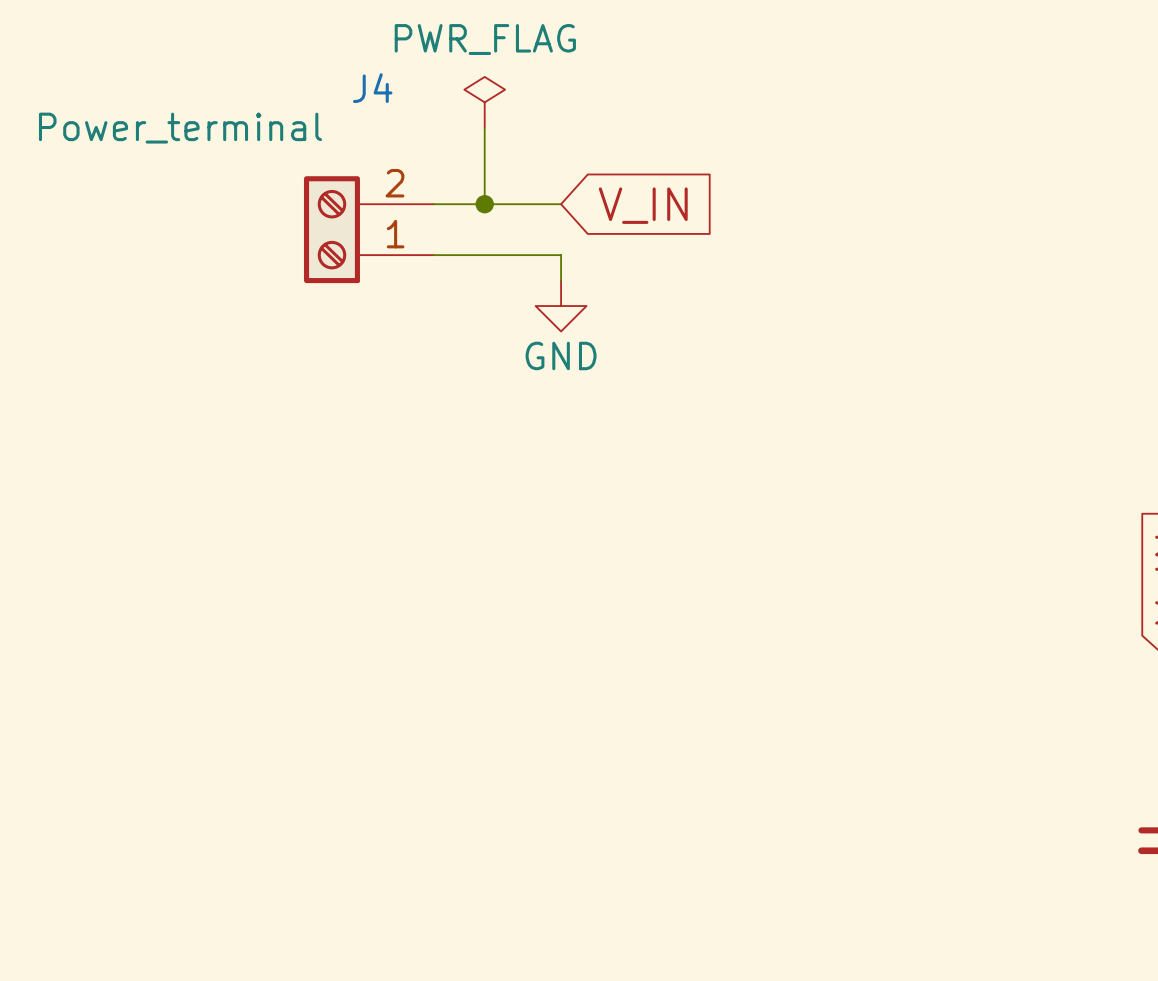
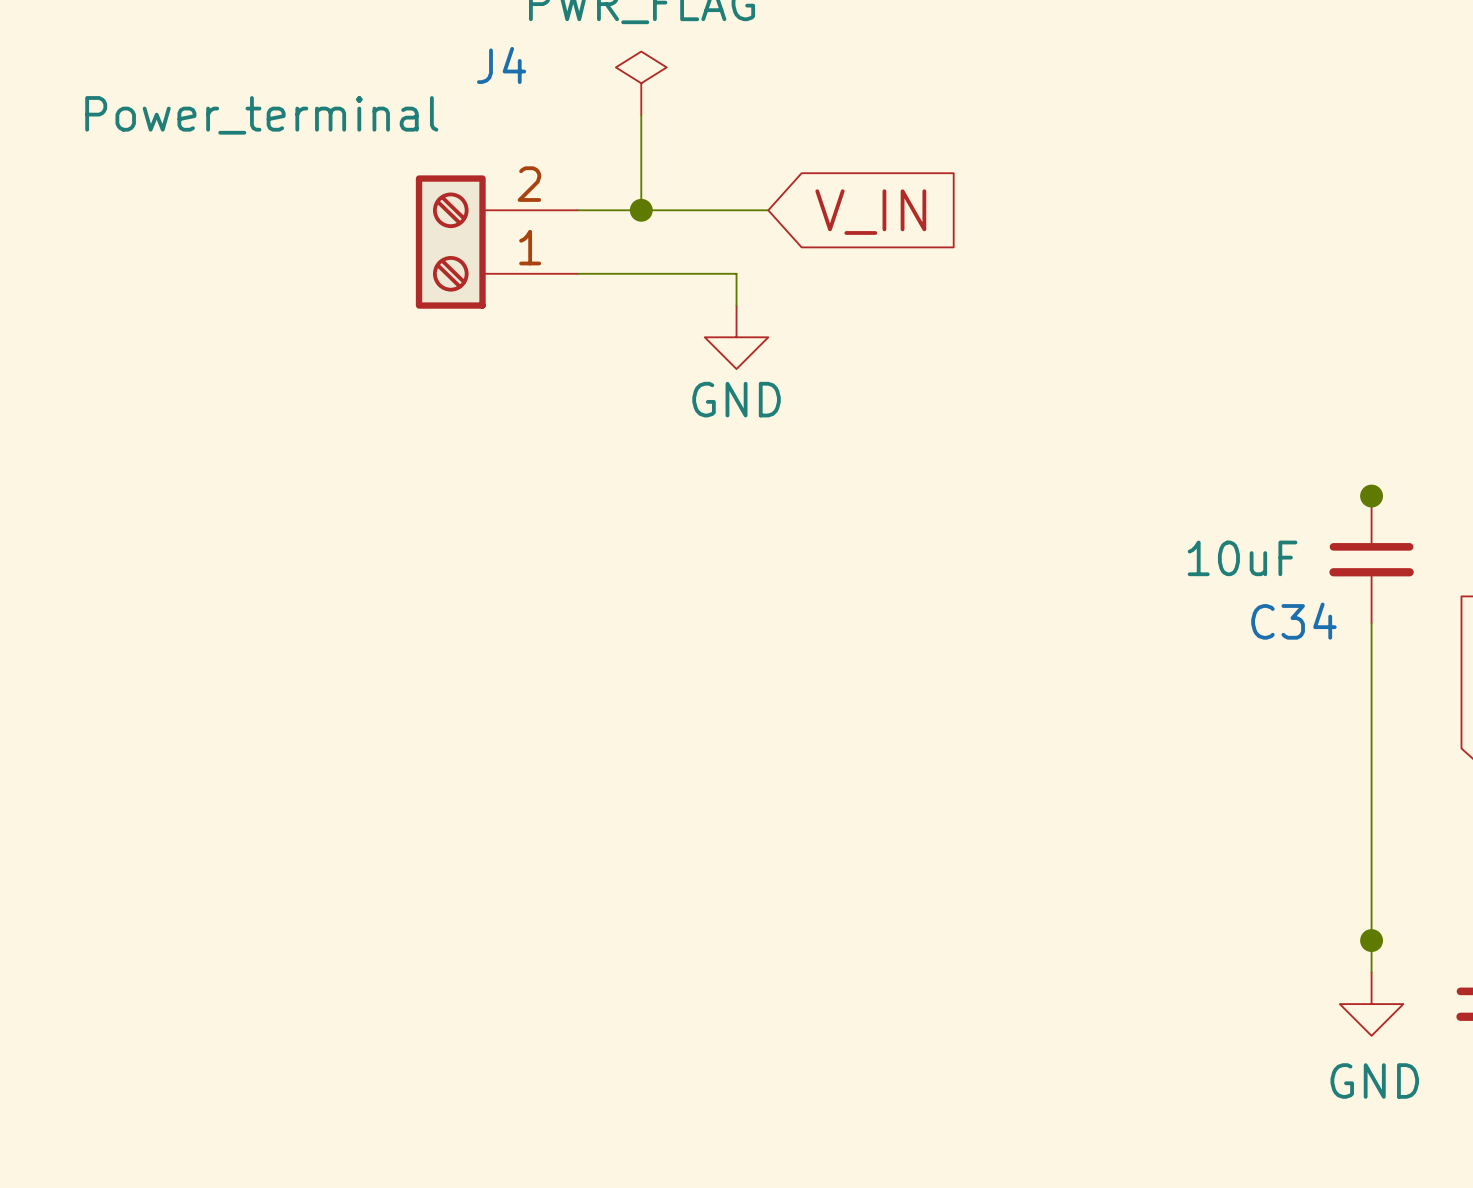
wire: none -> (736, 210) (768, 210)
global label position: V_IN (643, 205) -> V_IN (870, 212)
junction: none -> (1371, 496)
C34: none -> 10uF (1371, 559)
wire: none -> (1371, 623) (1371, 972)
junction: none -> (1371, 940)
power symbol: none -> GND (1371, 1004)

